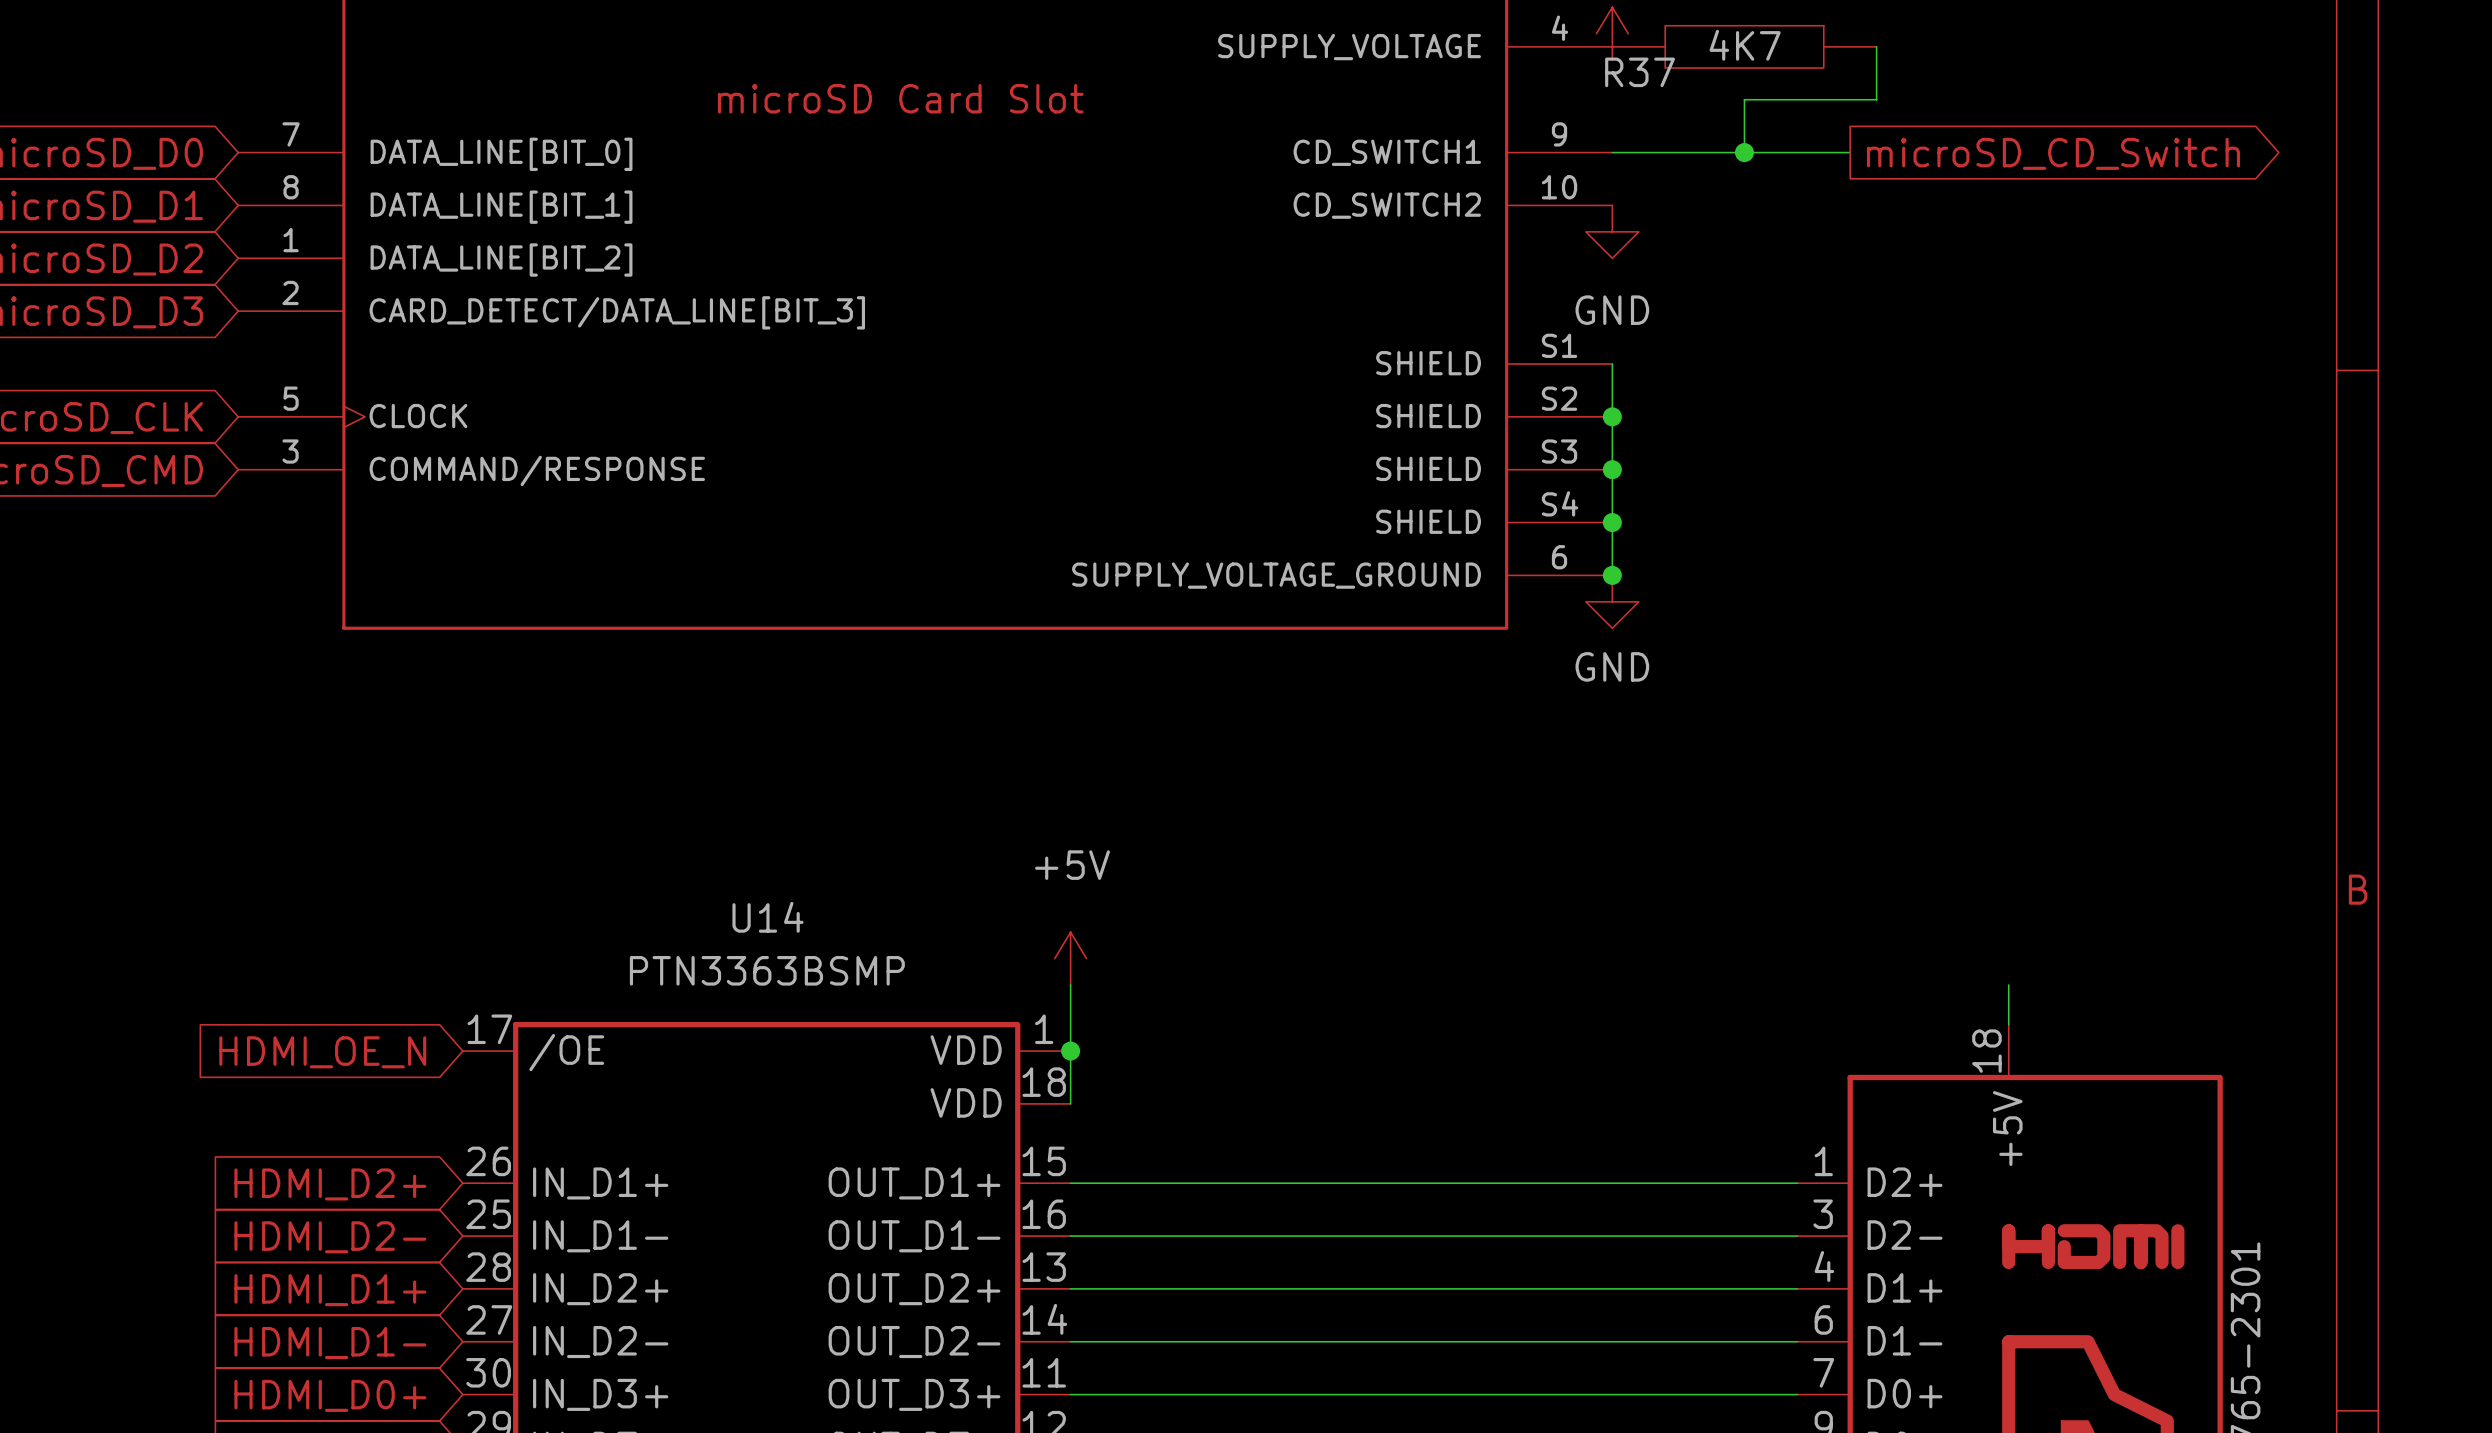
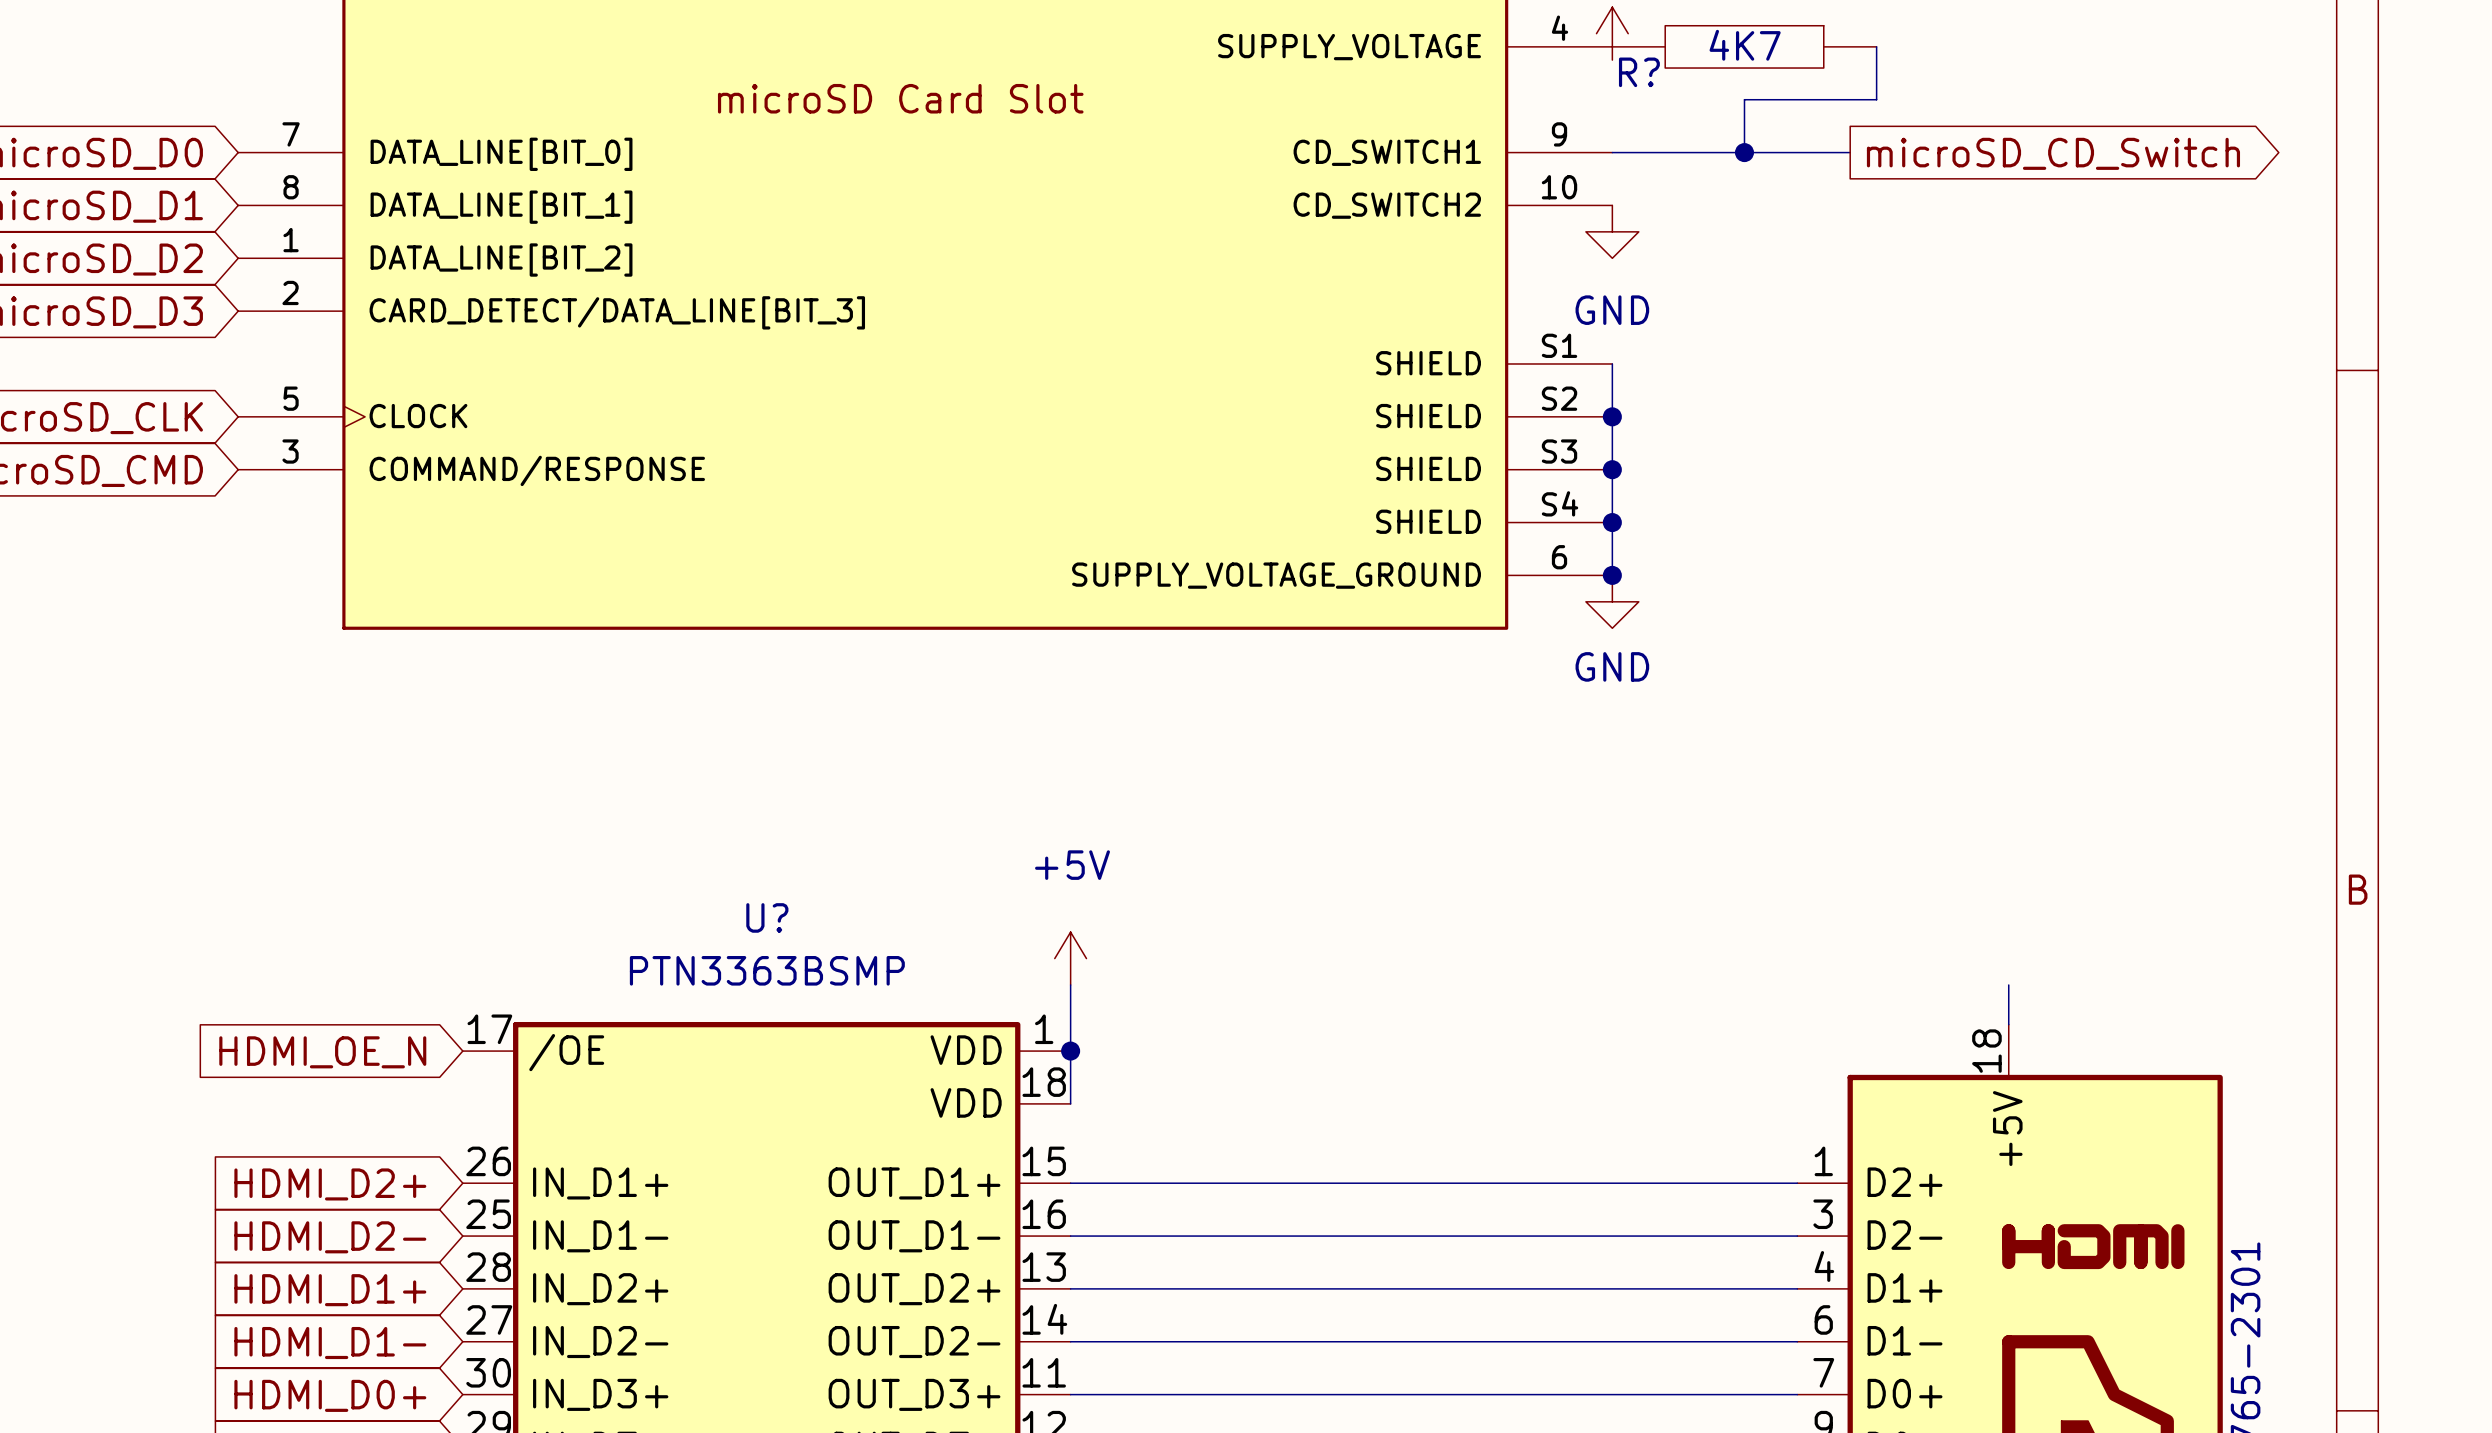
R37 name: R37 (1640, 72) -> R? (1639, 72)
U14 name: U14 (767, 917) -> U? (767, 917)

